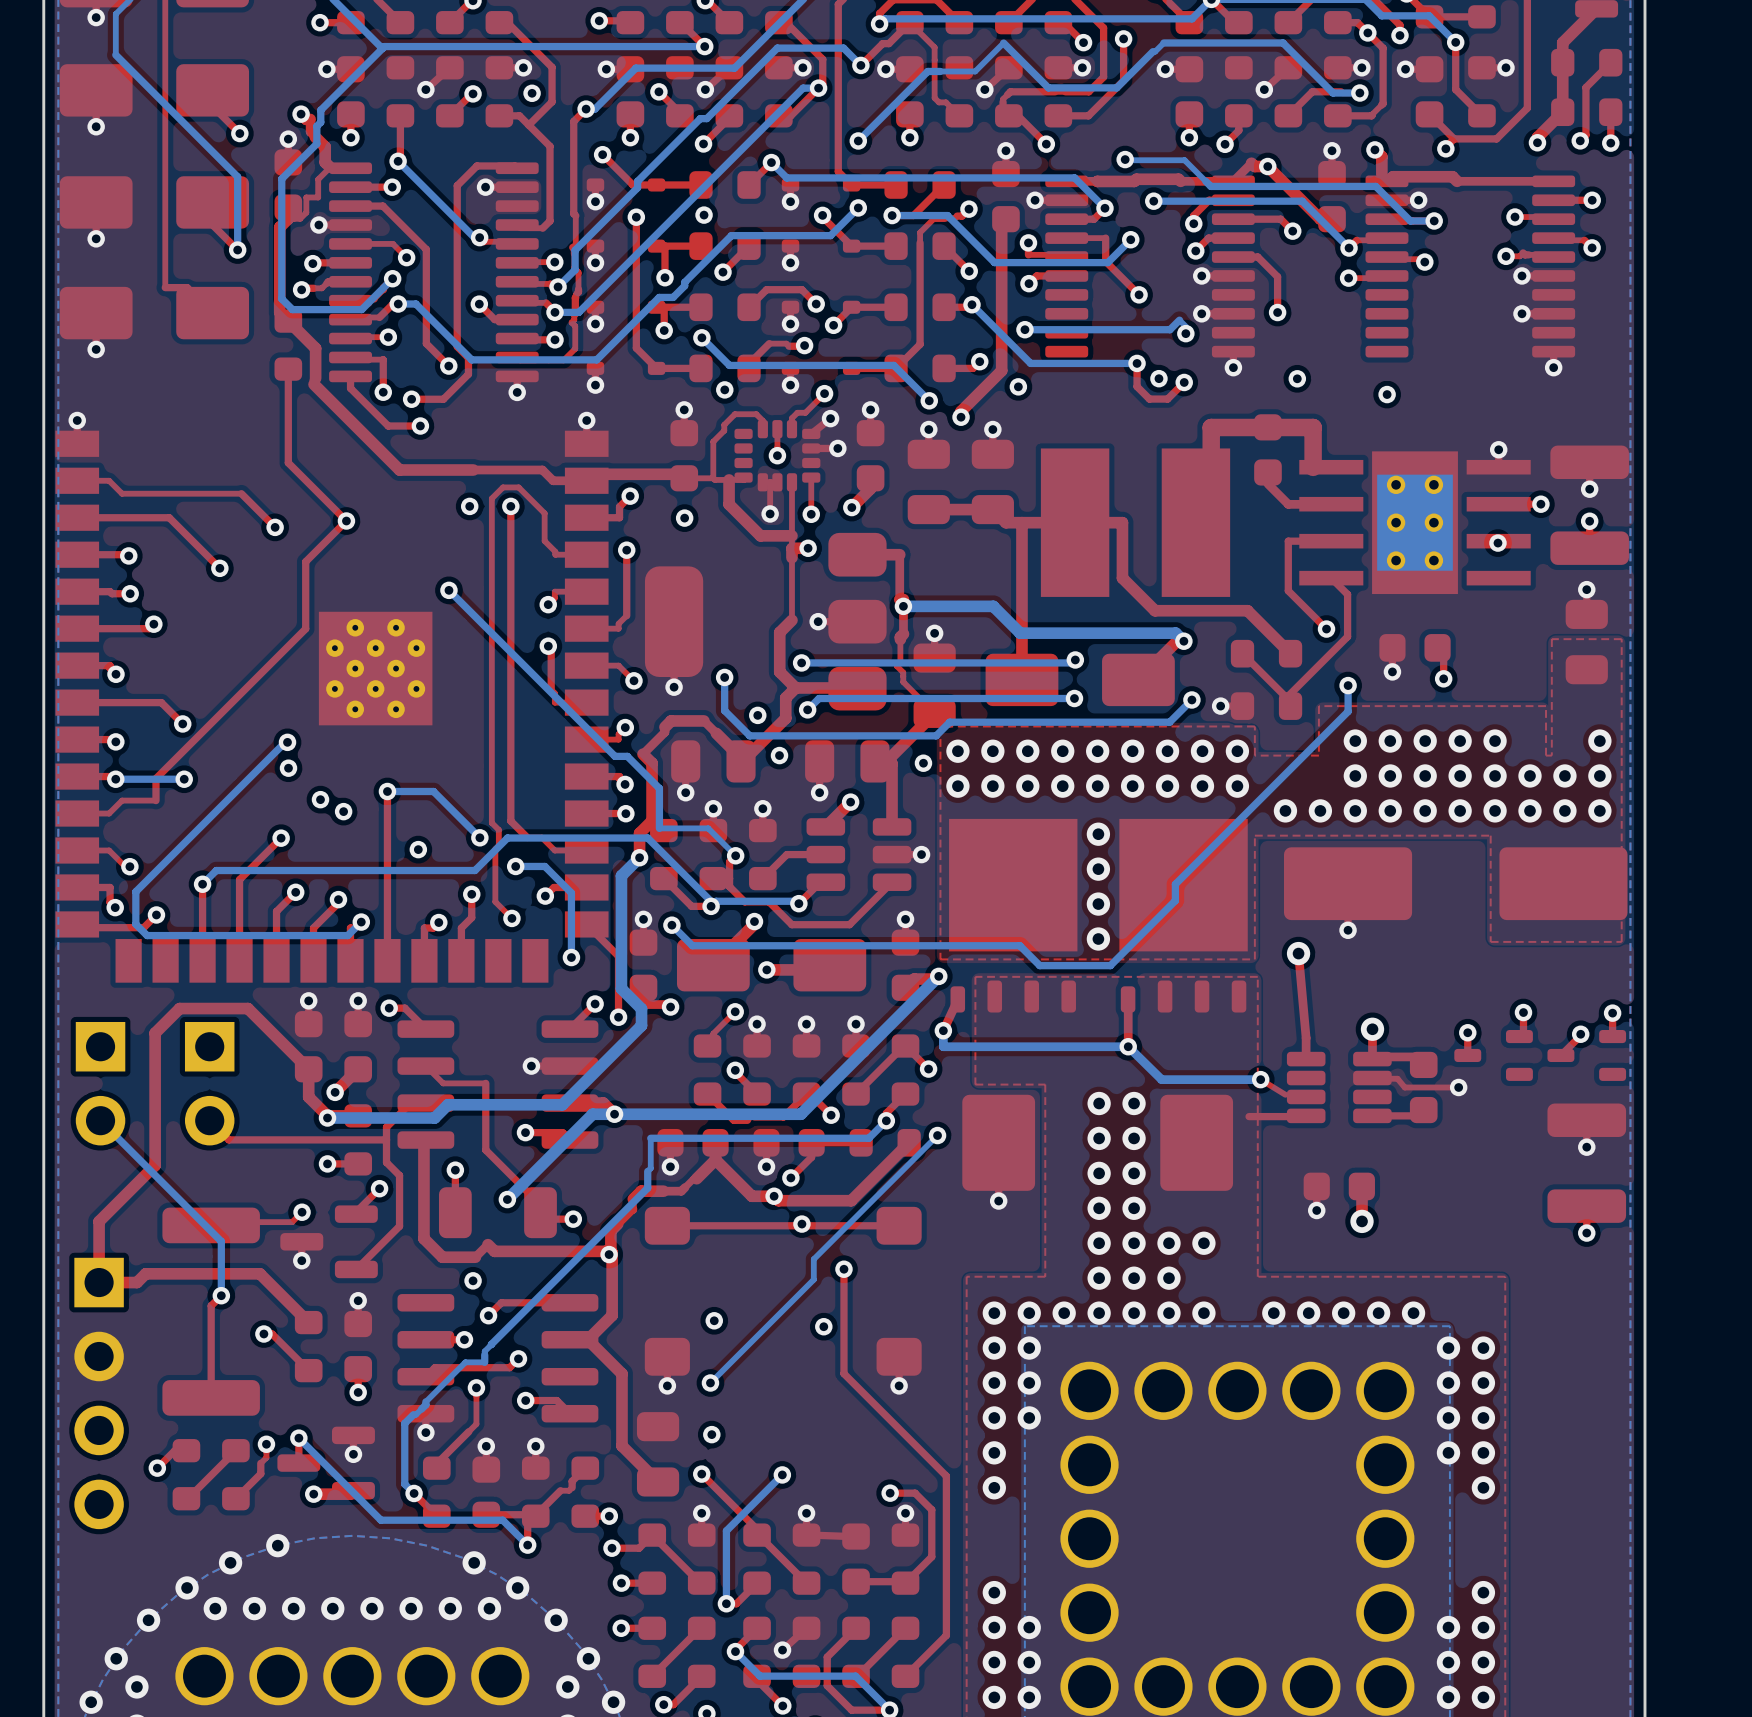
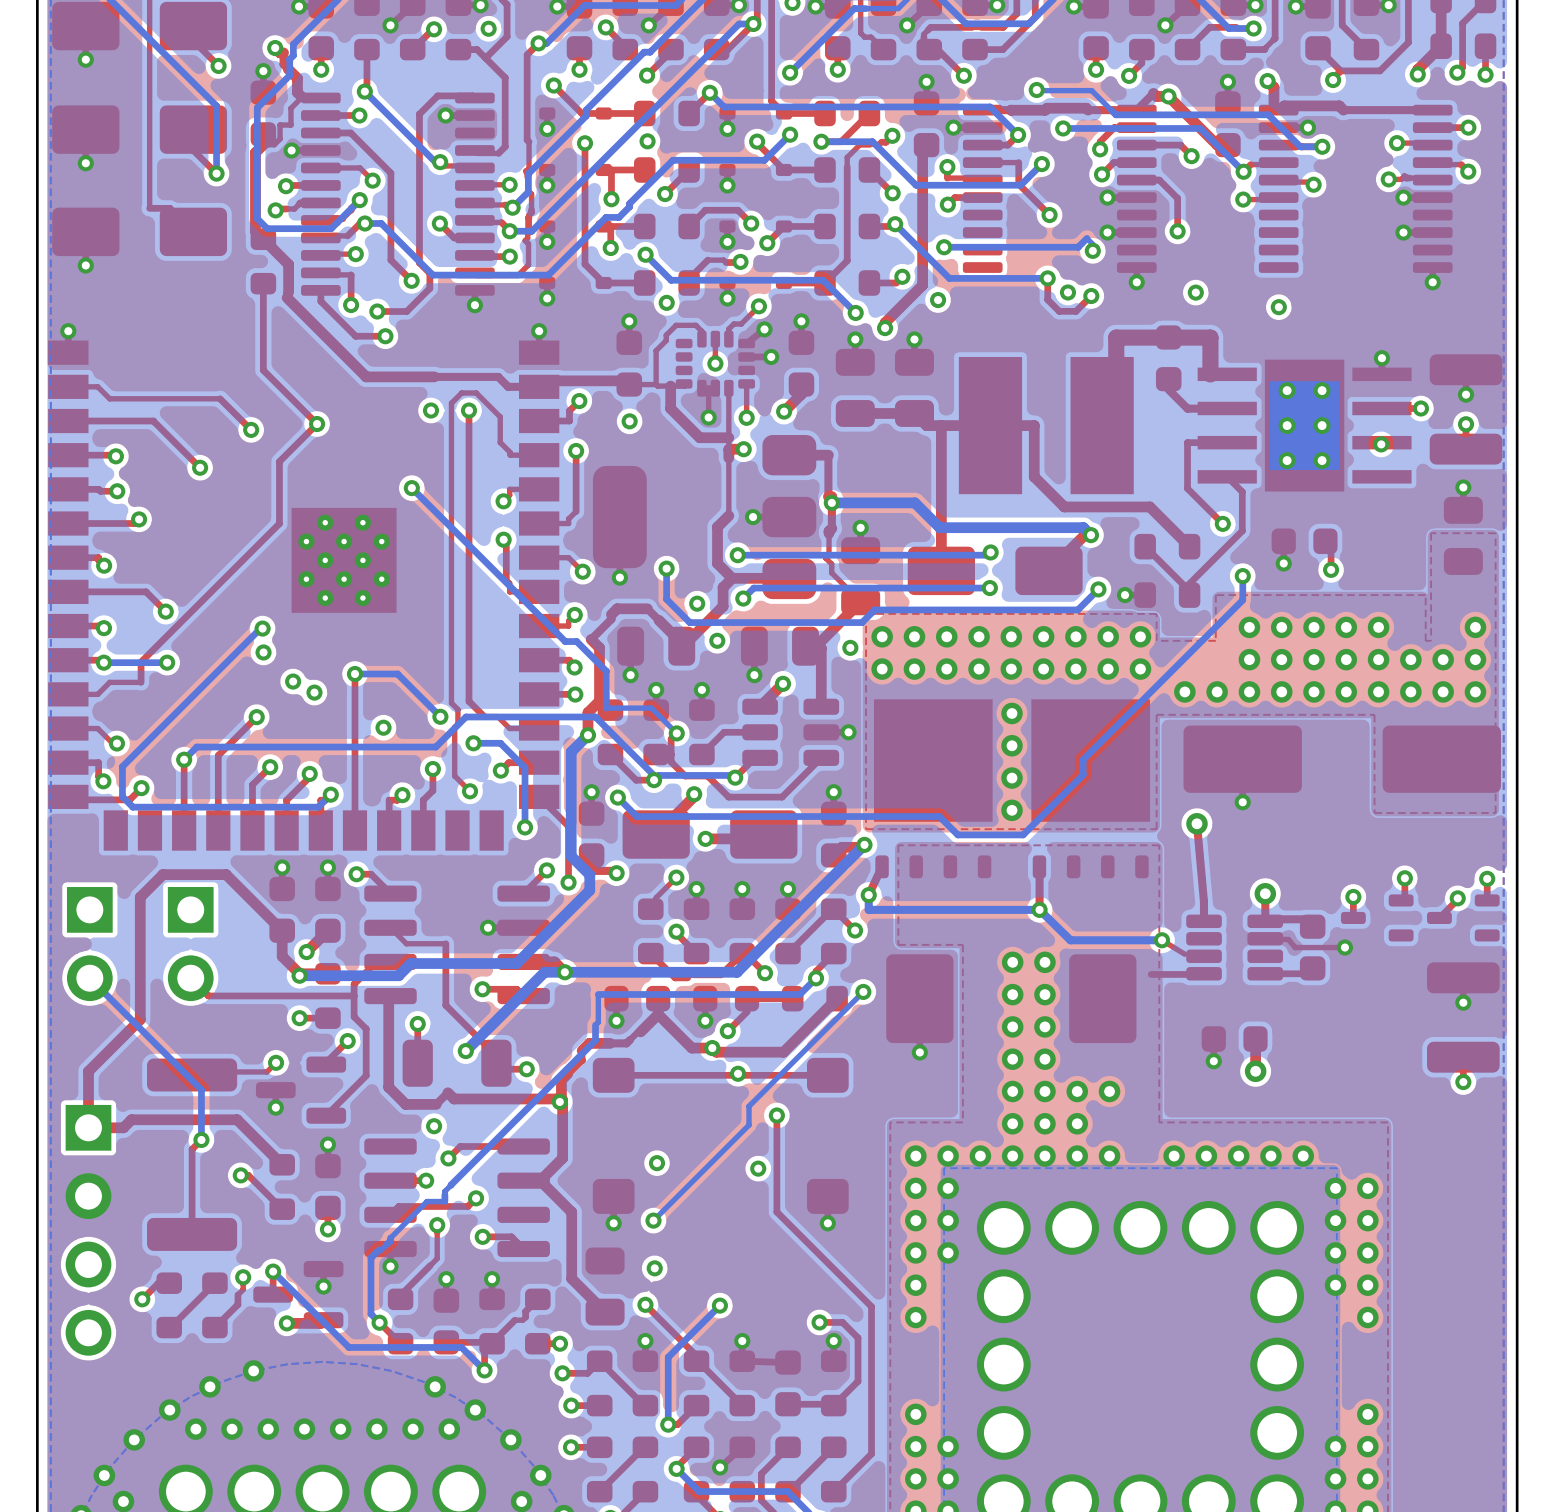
part footprint: [949, 818, 1078, 1013] -> [873, 699, 993, 879]
part footprint: [1119, 818, 1248, 1013] -> [1031, 699, 1151, 879]

